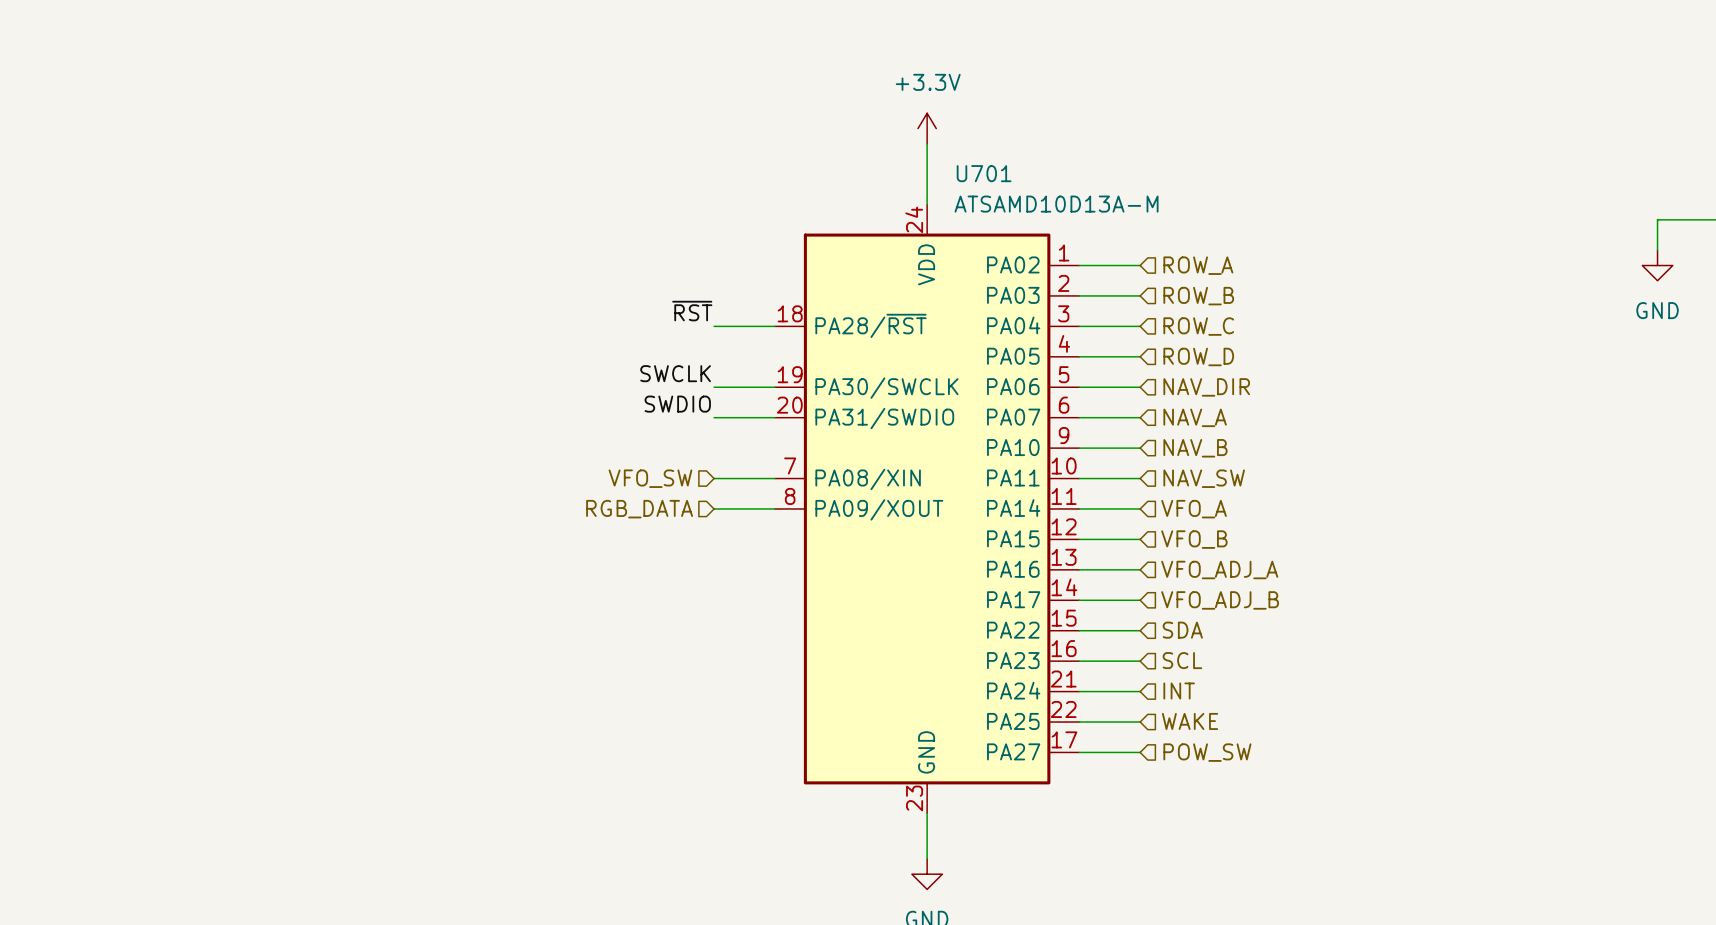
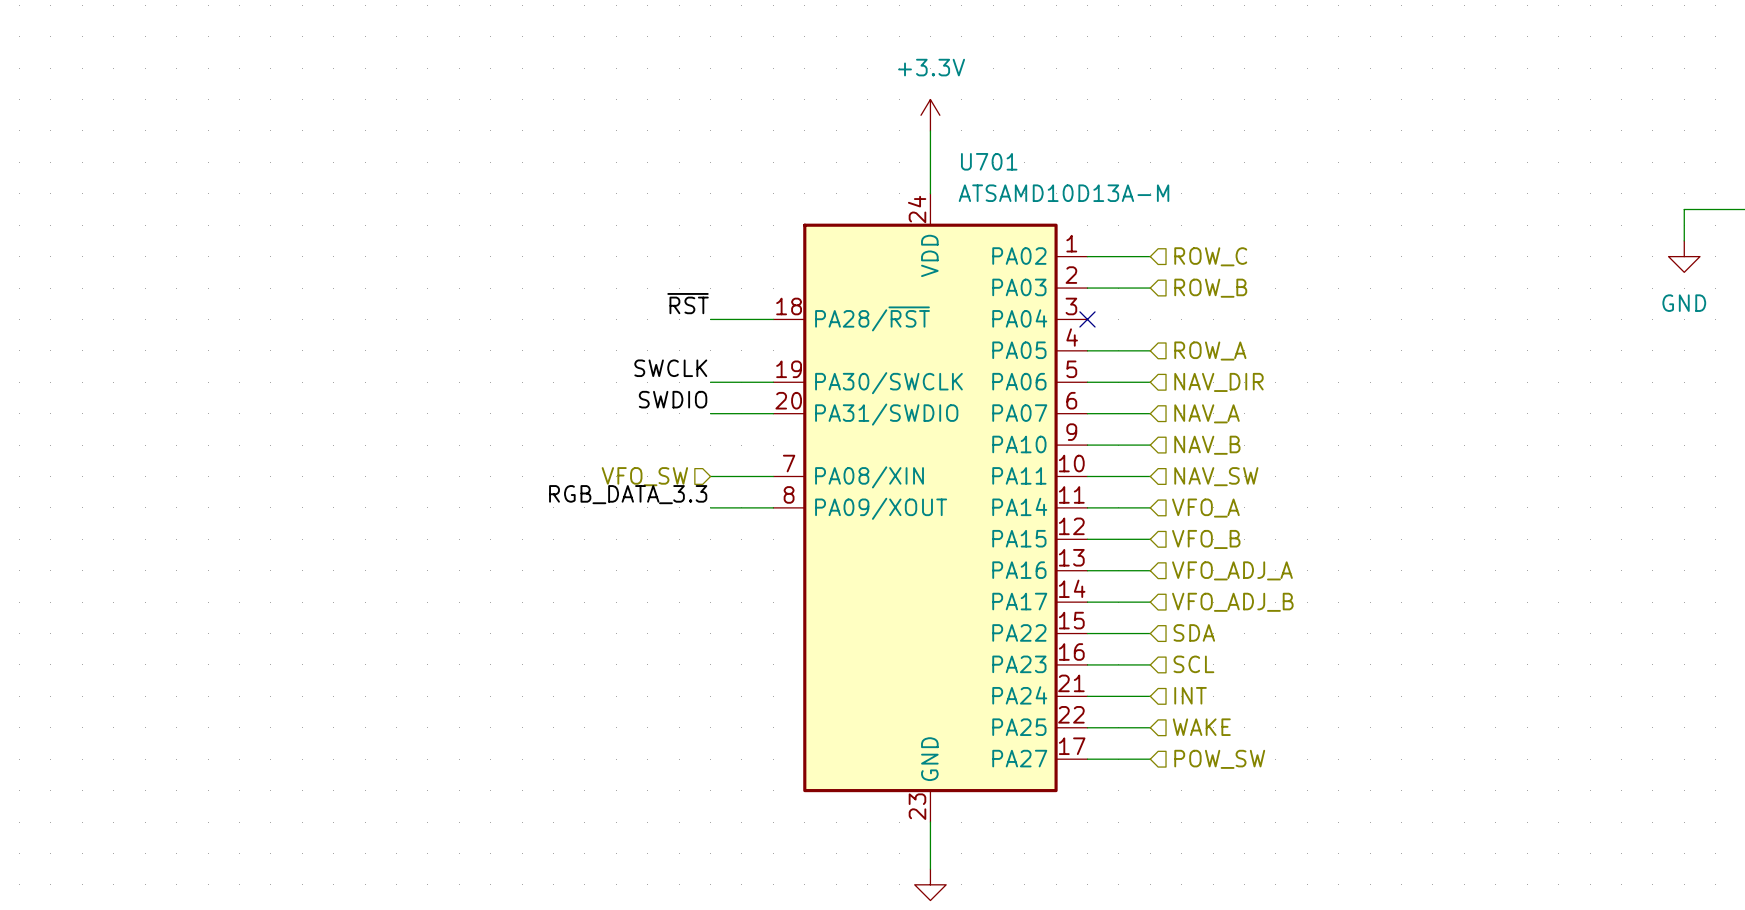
hierarchical label: ROW_A (1198, 265) -> ROW_C (1210, 256)
wire: (1079, 326) (1140, 326) -> none
no-connect mark: none -> (1087, 319)
hierarchical label: ROW_C (1198, 326) -> none
hierarchical label: ROW_D (1198, 356) -> ROW_A (1210, 351)
label: none -> RGB_DATA_3.3 (628, 494)
hierarchical label: RGB_DATA (639, 509) -> none

